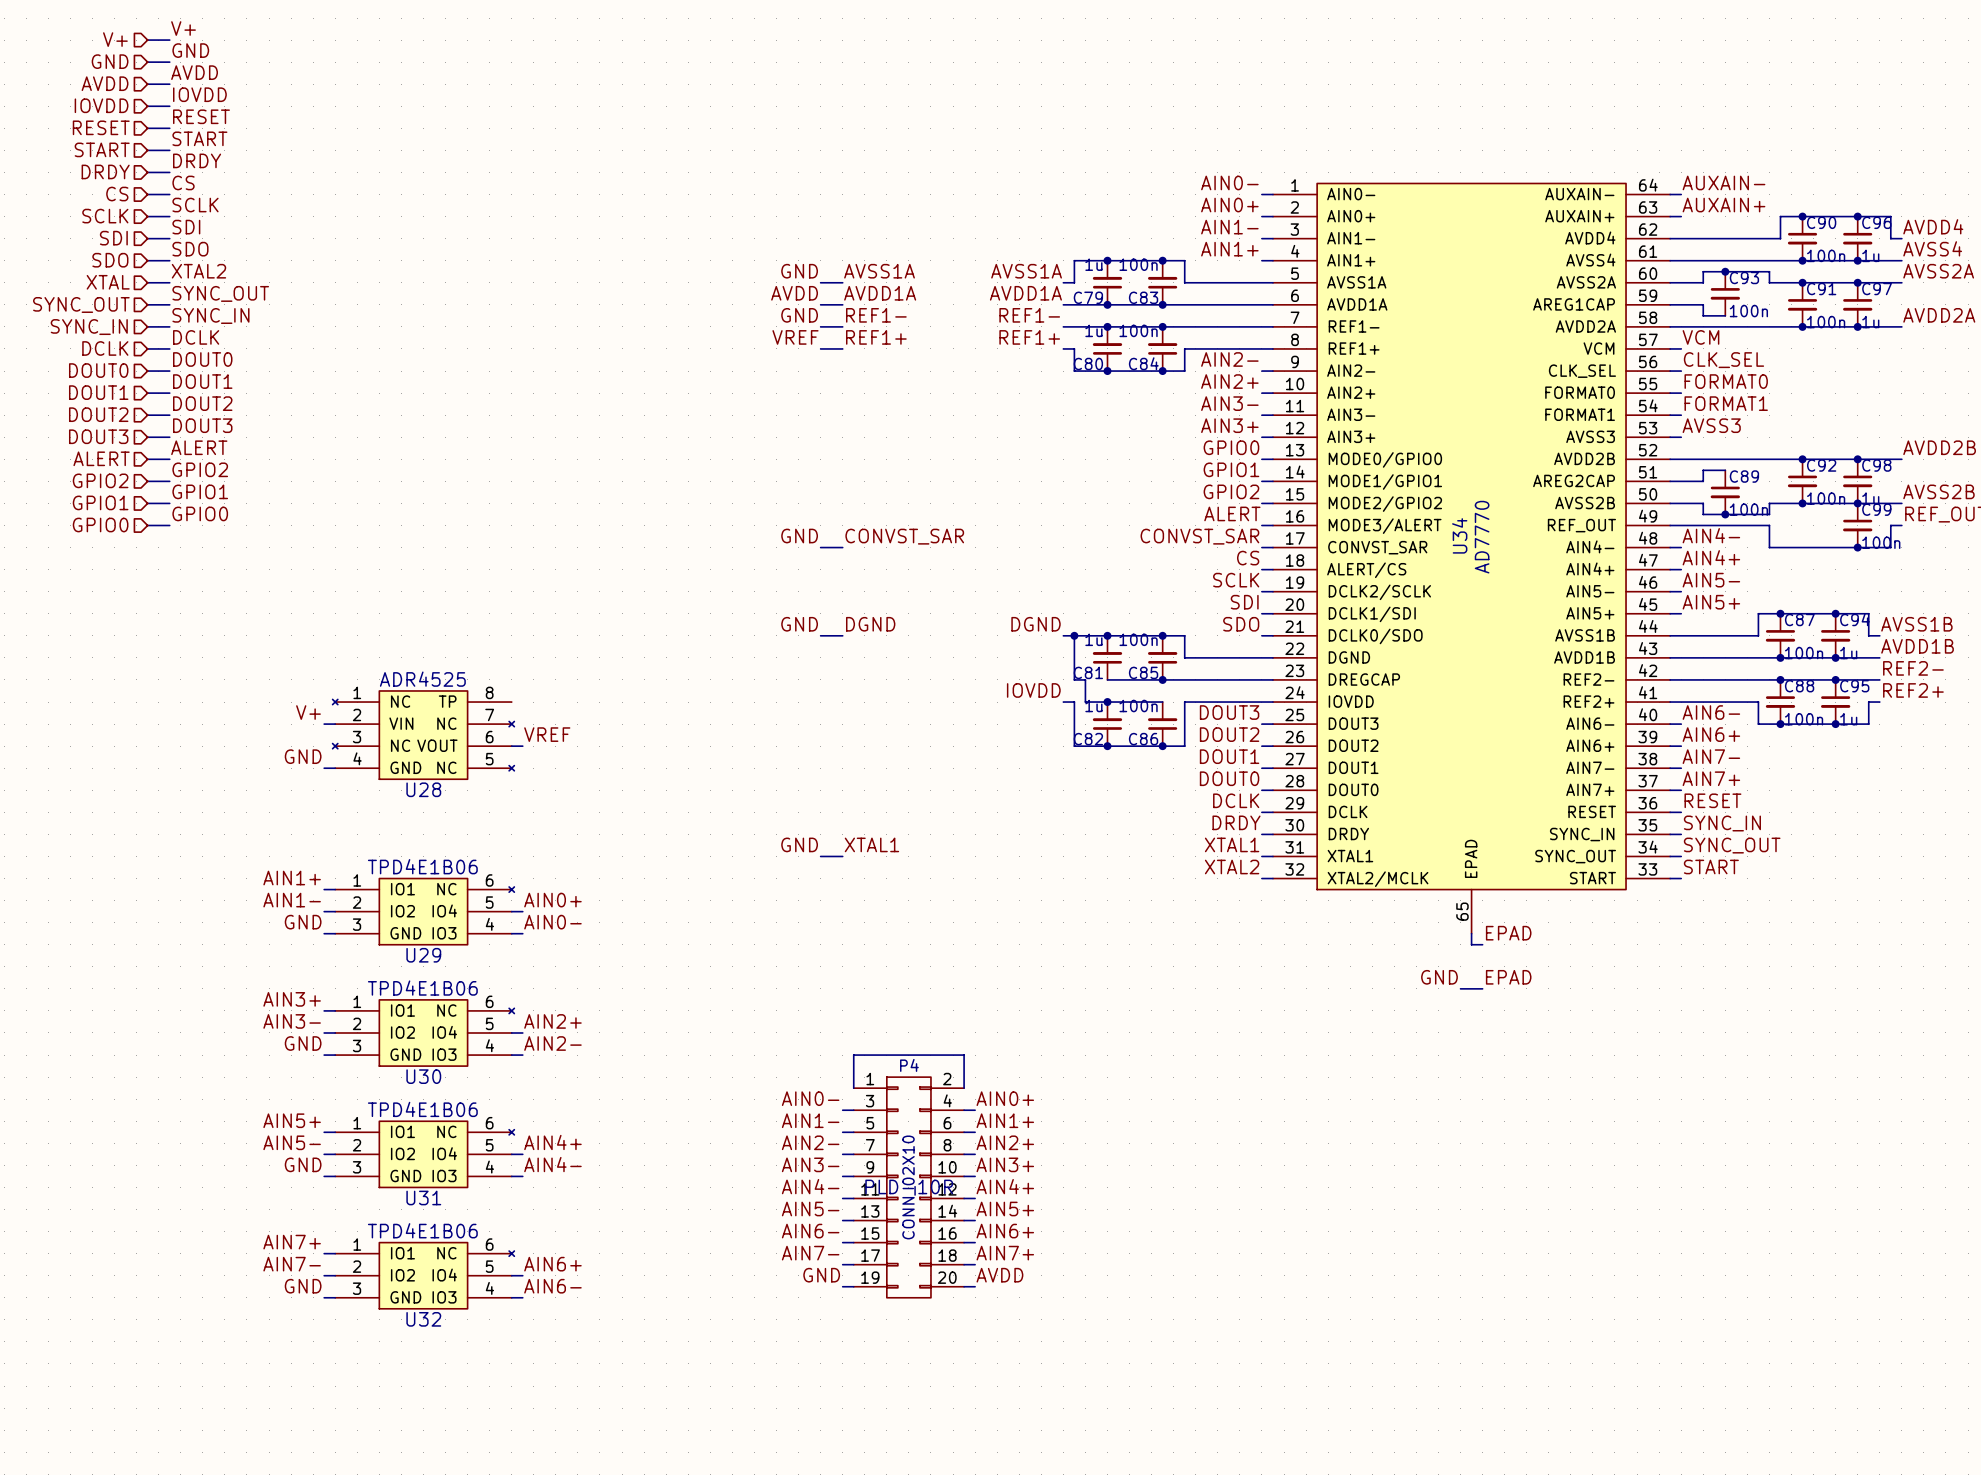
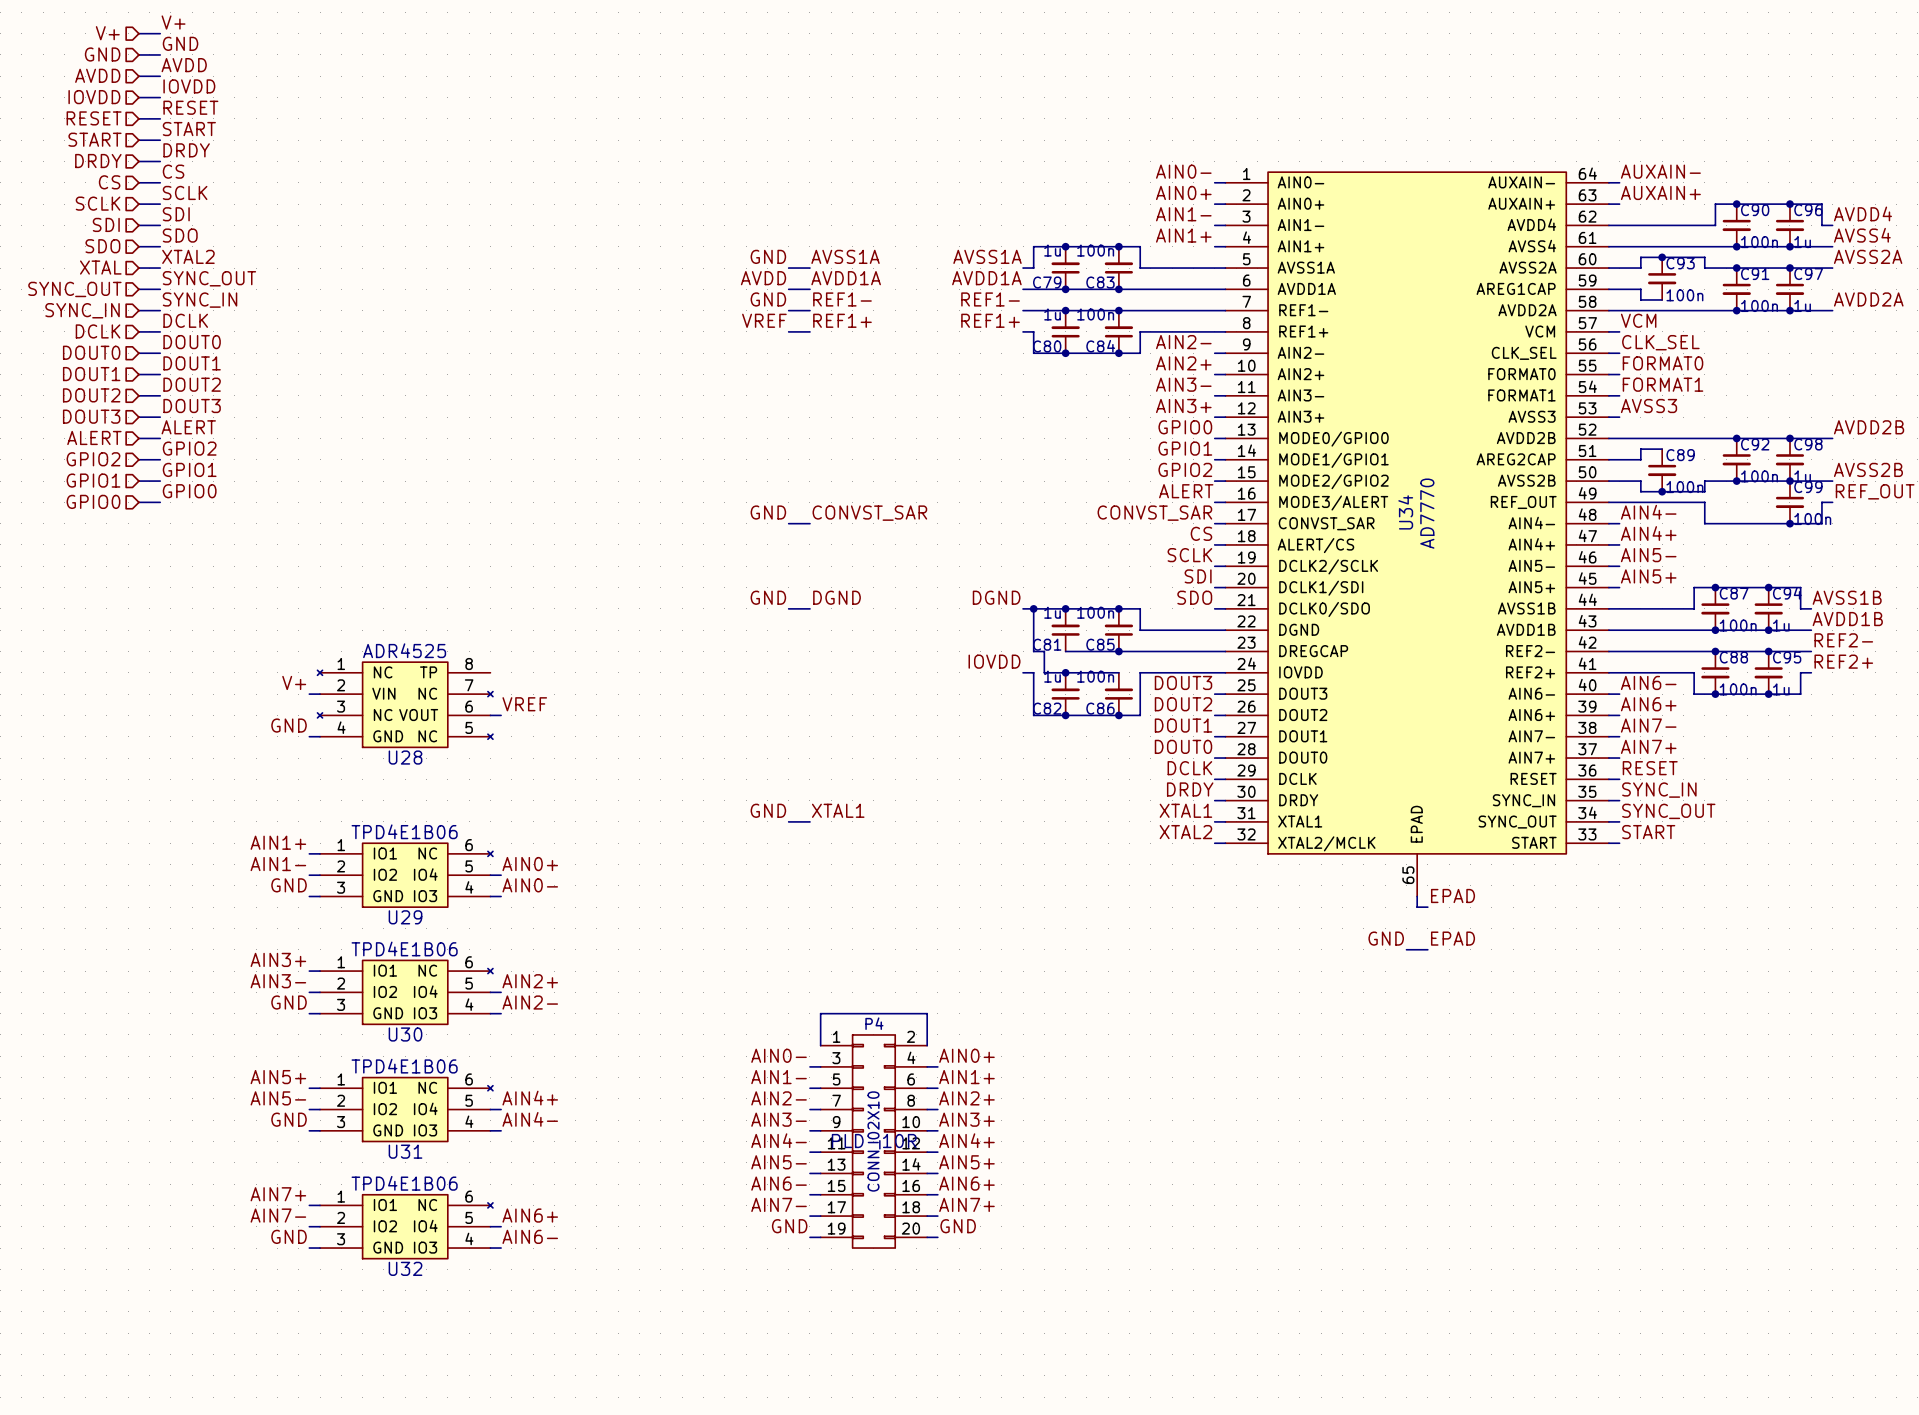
label: AVDD (999, 1275) -> GND (958, 1226)

